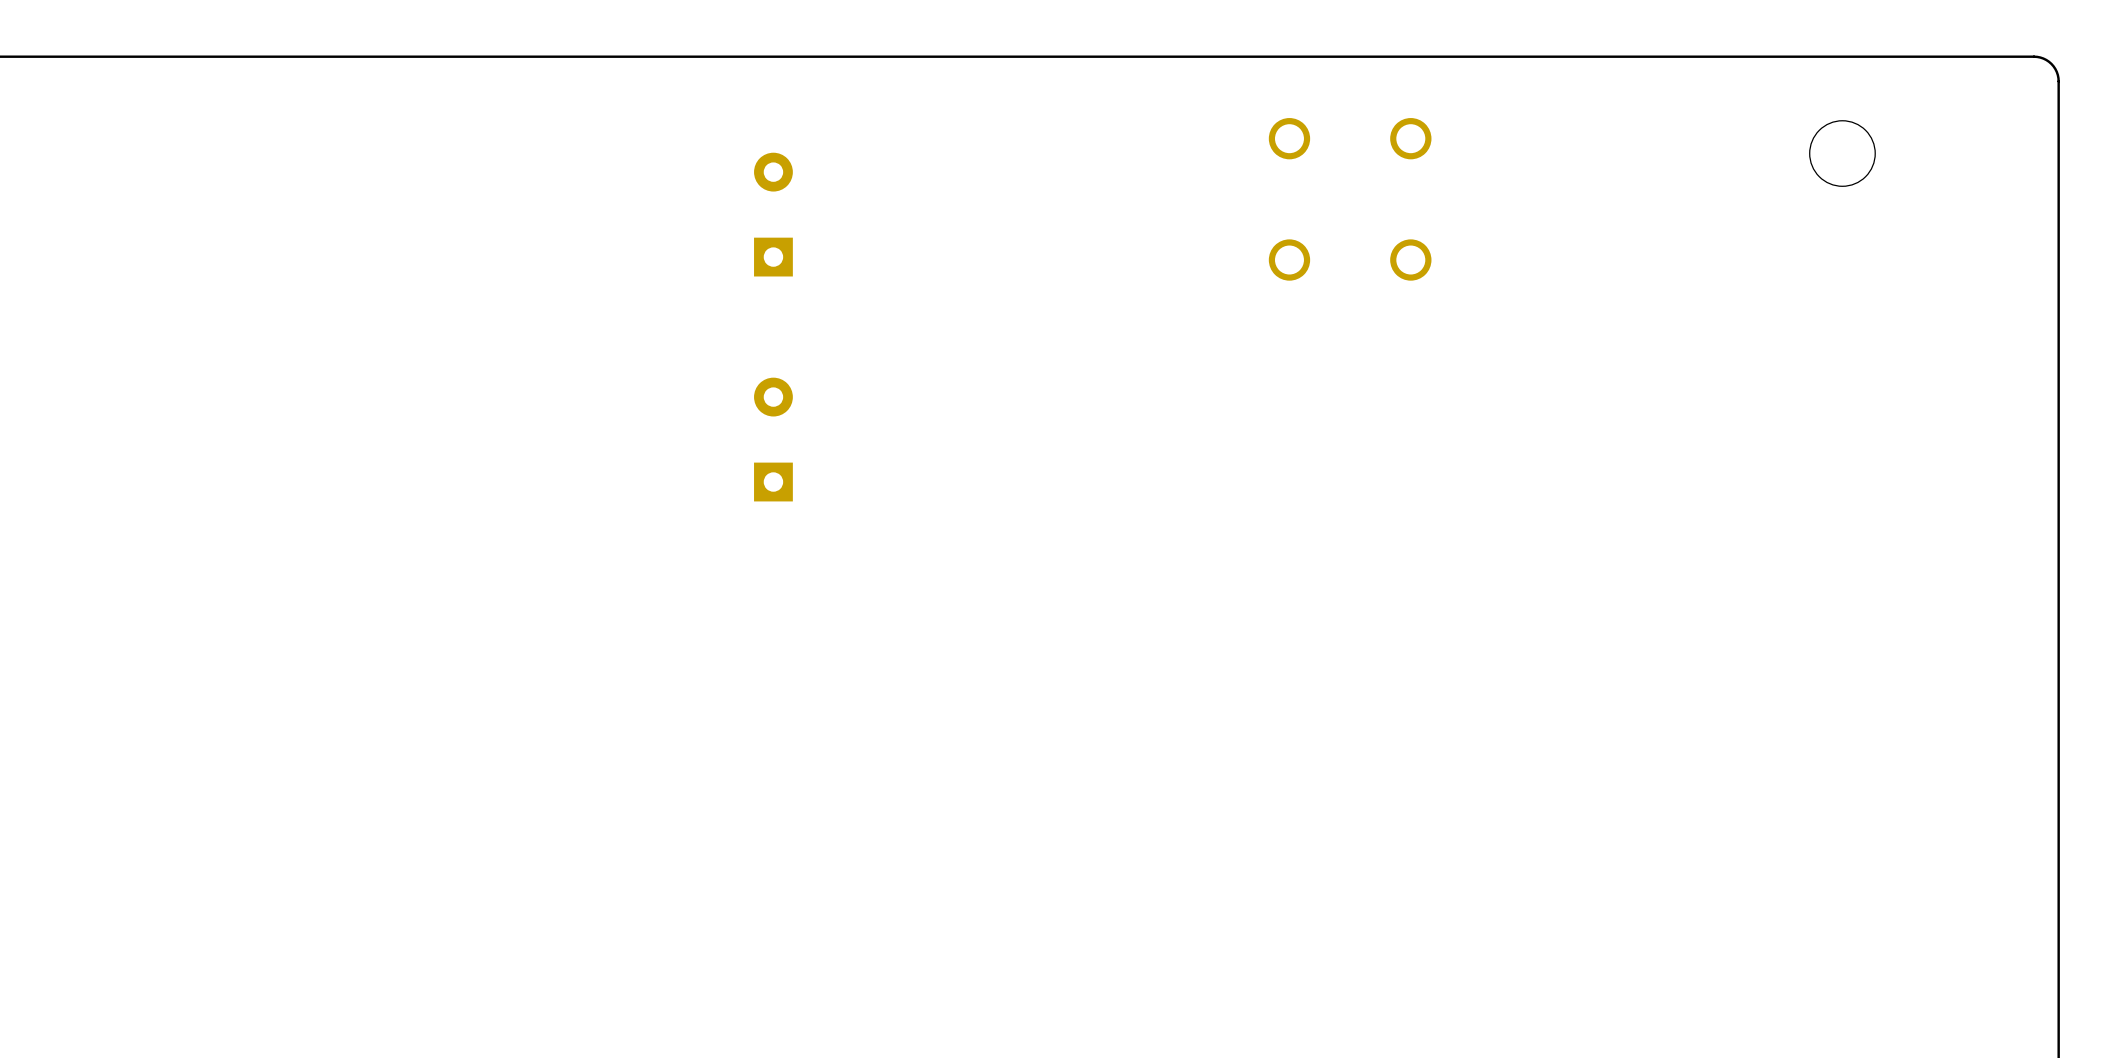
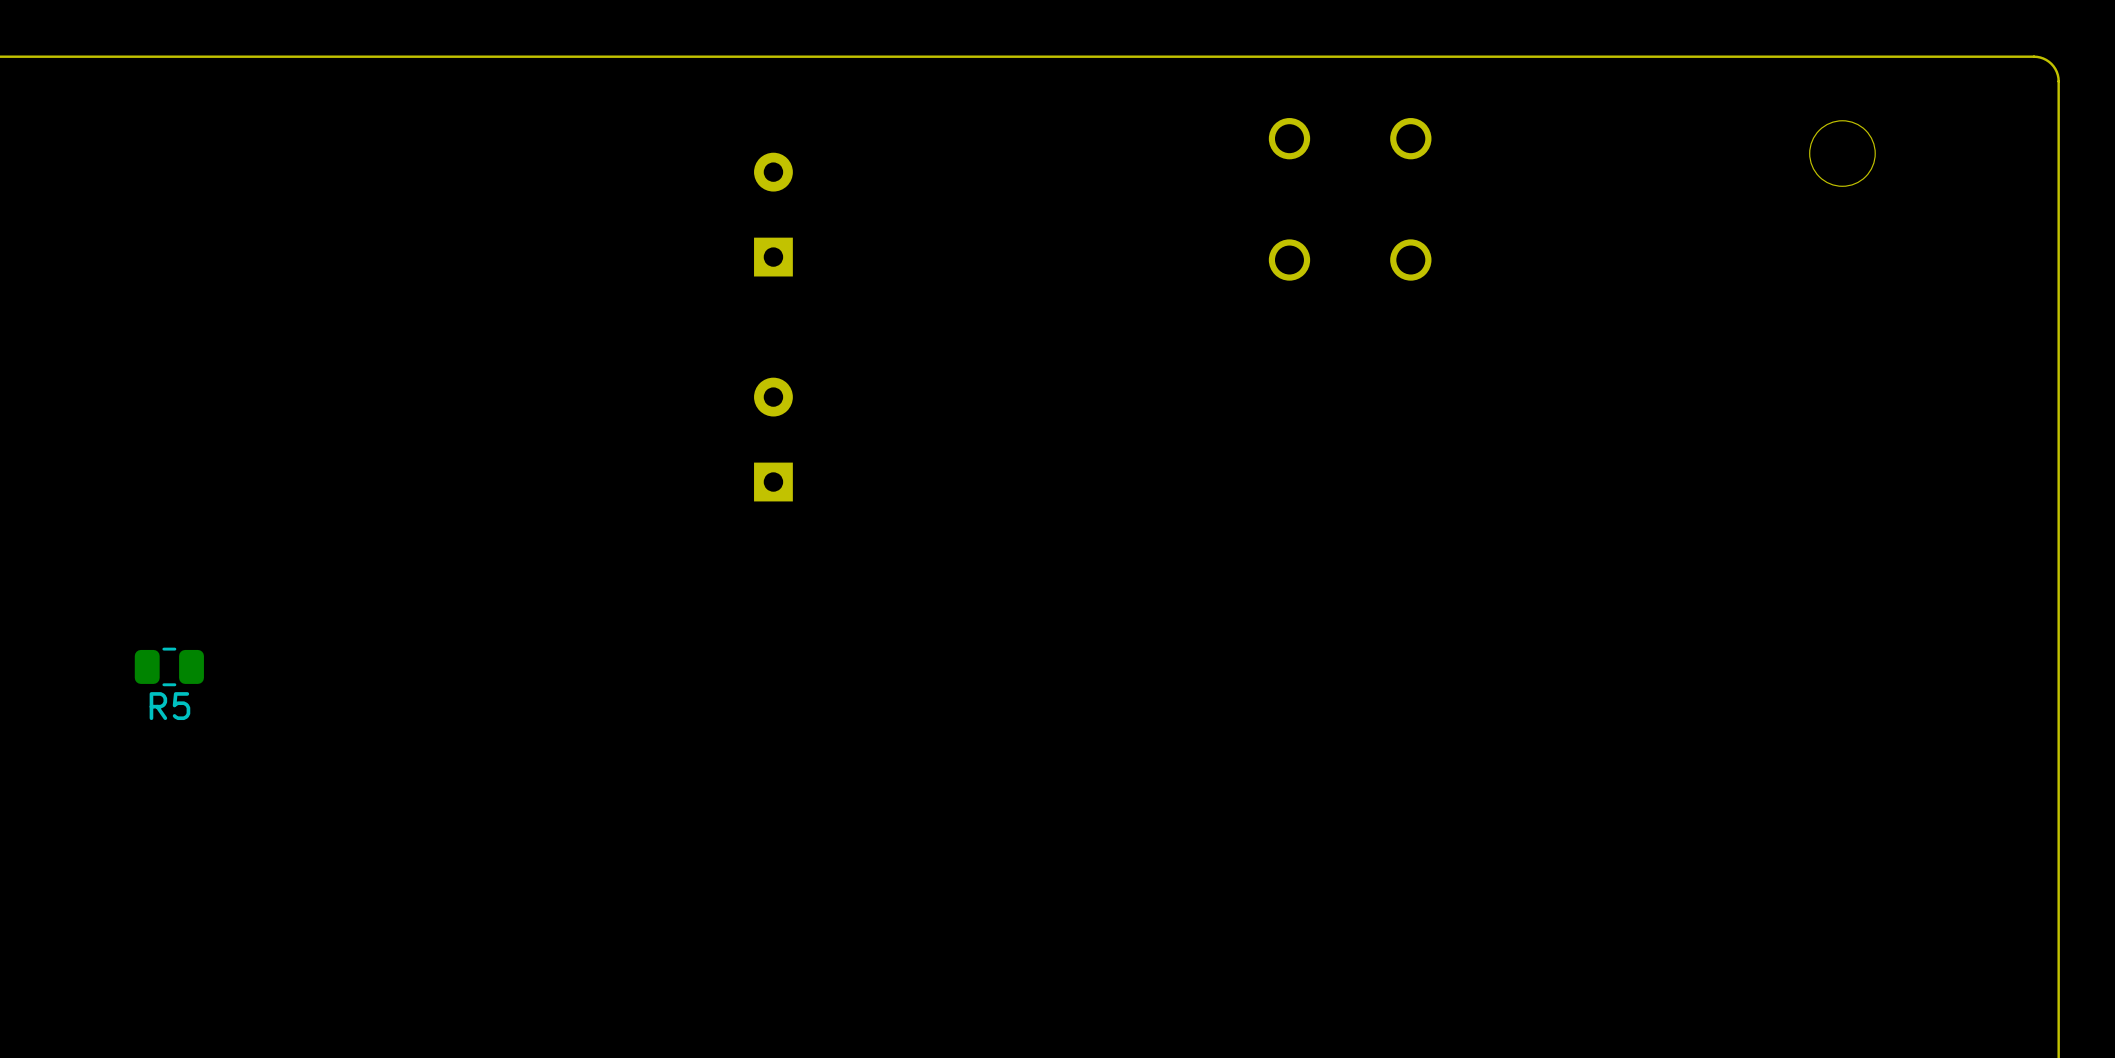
R5: none -> (169, 666)

